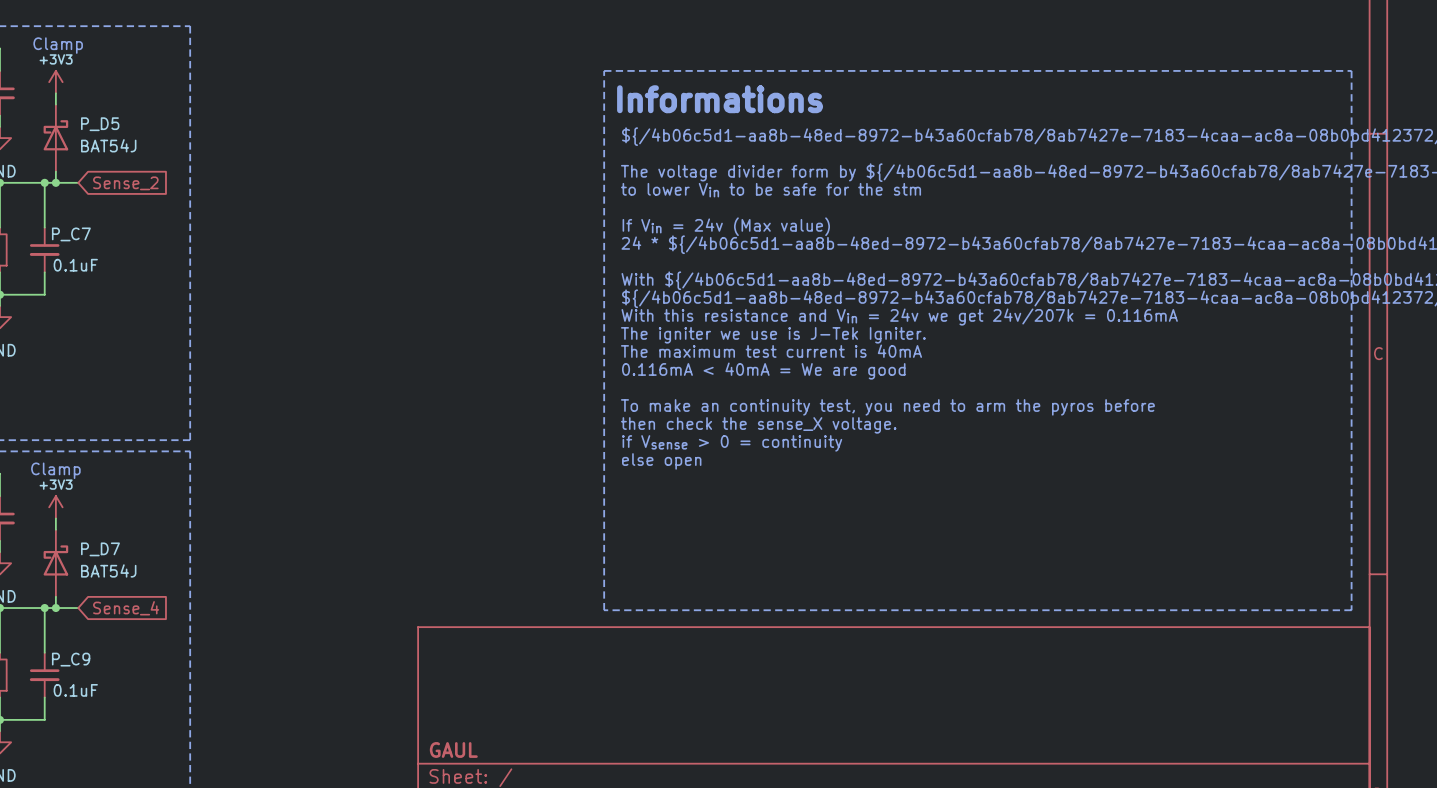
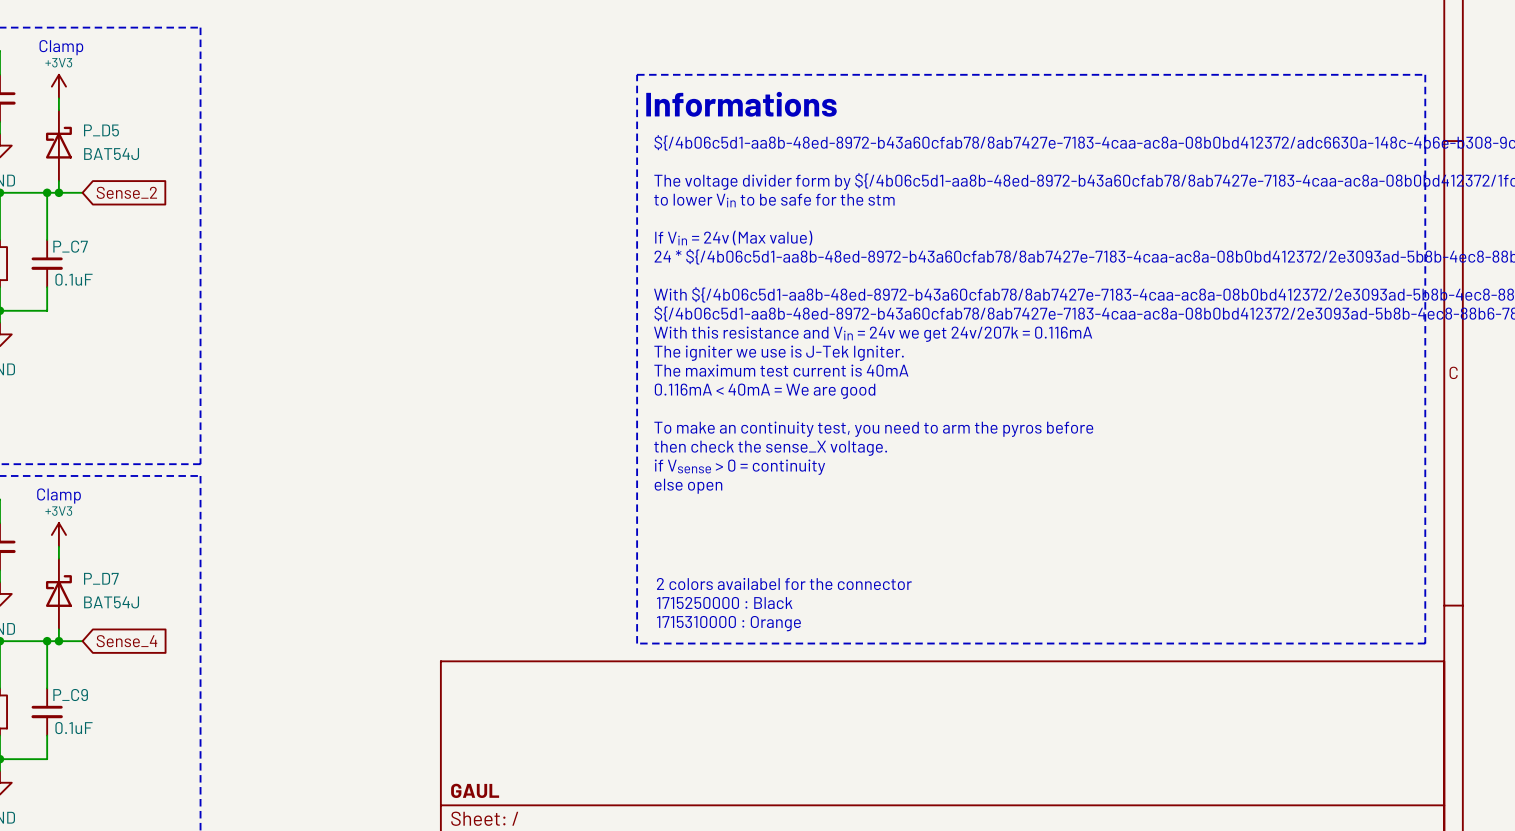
text: none -> 2 colors availabel for the connector (784, 584)
text: none -> 1715250000 : Black (724, 603)
text: none -> 1715310000 : Orange (728, 623)

